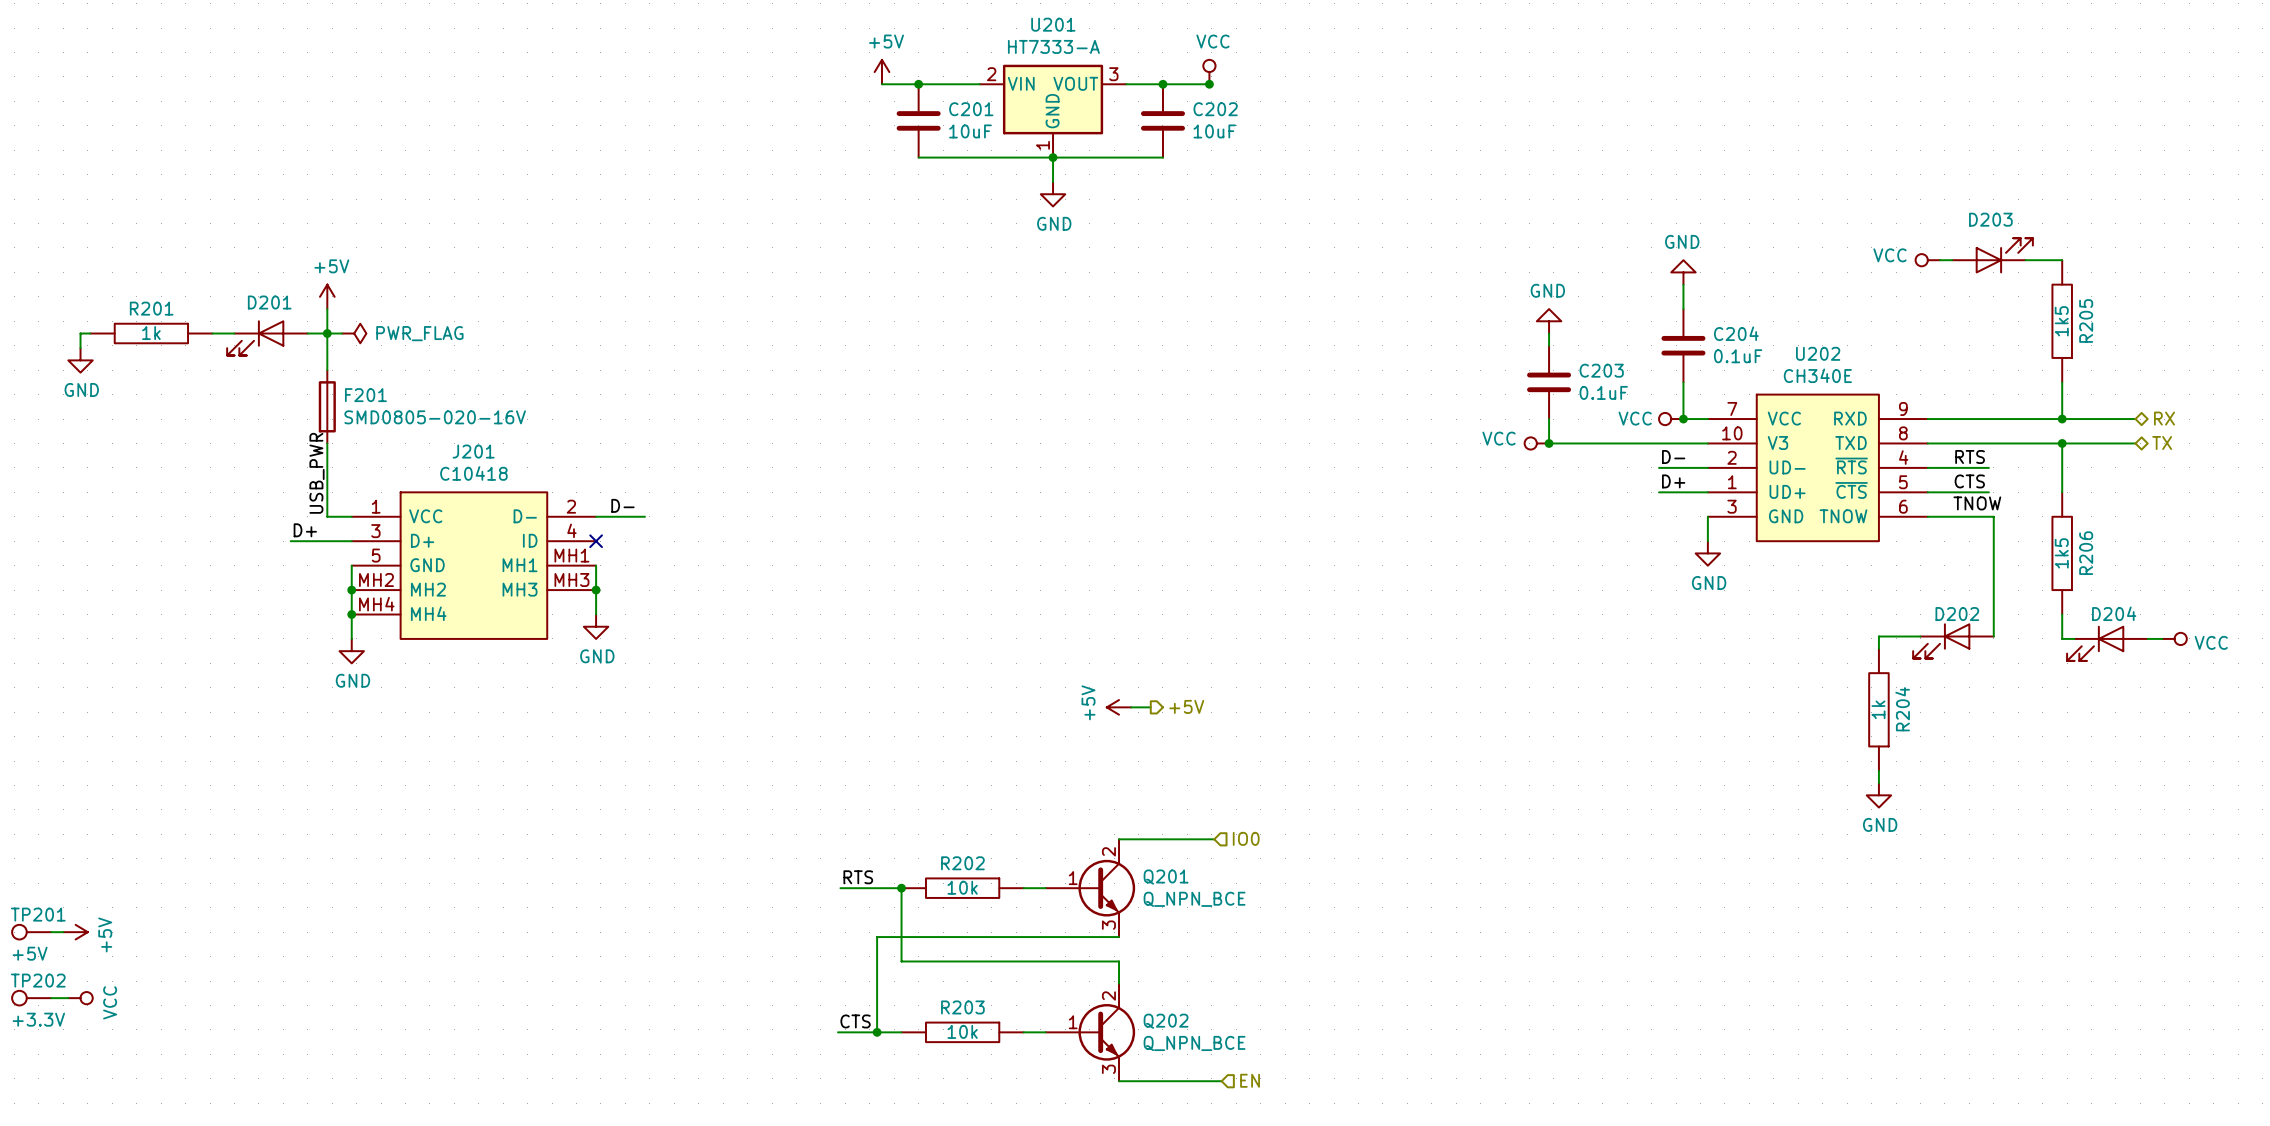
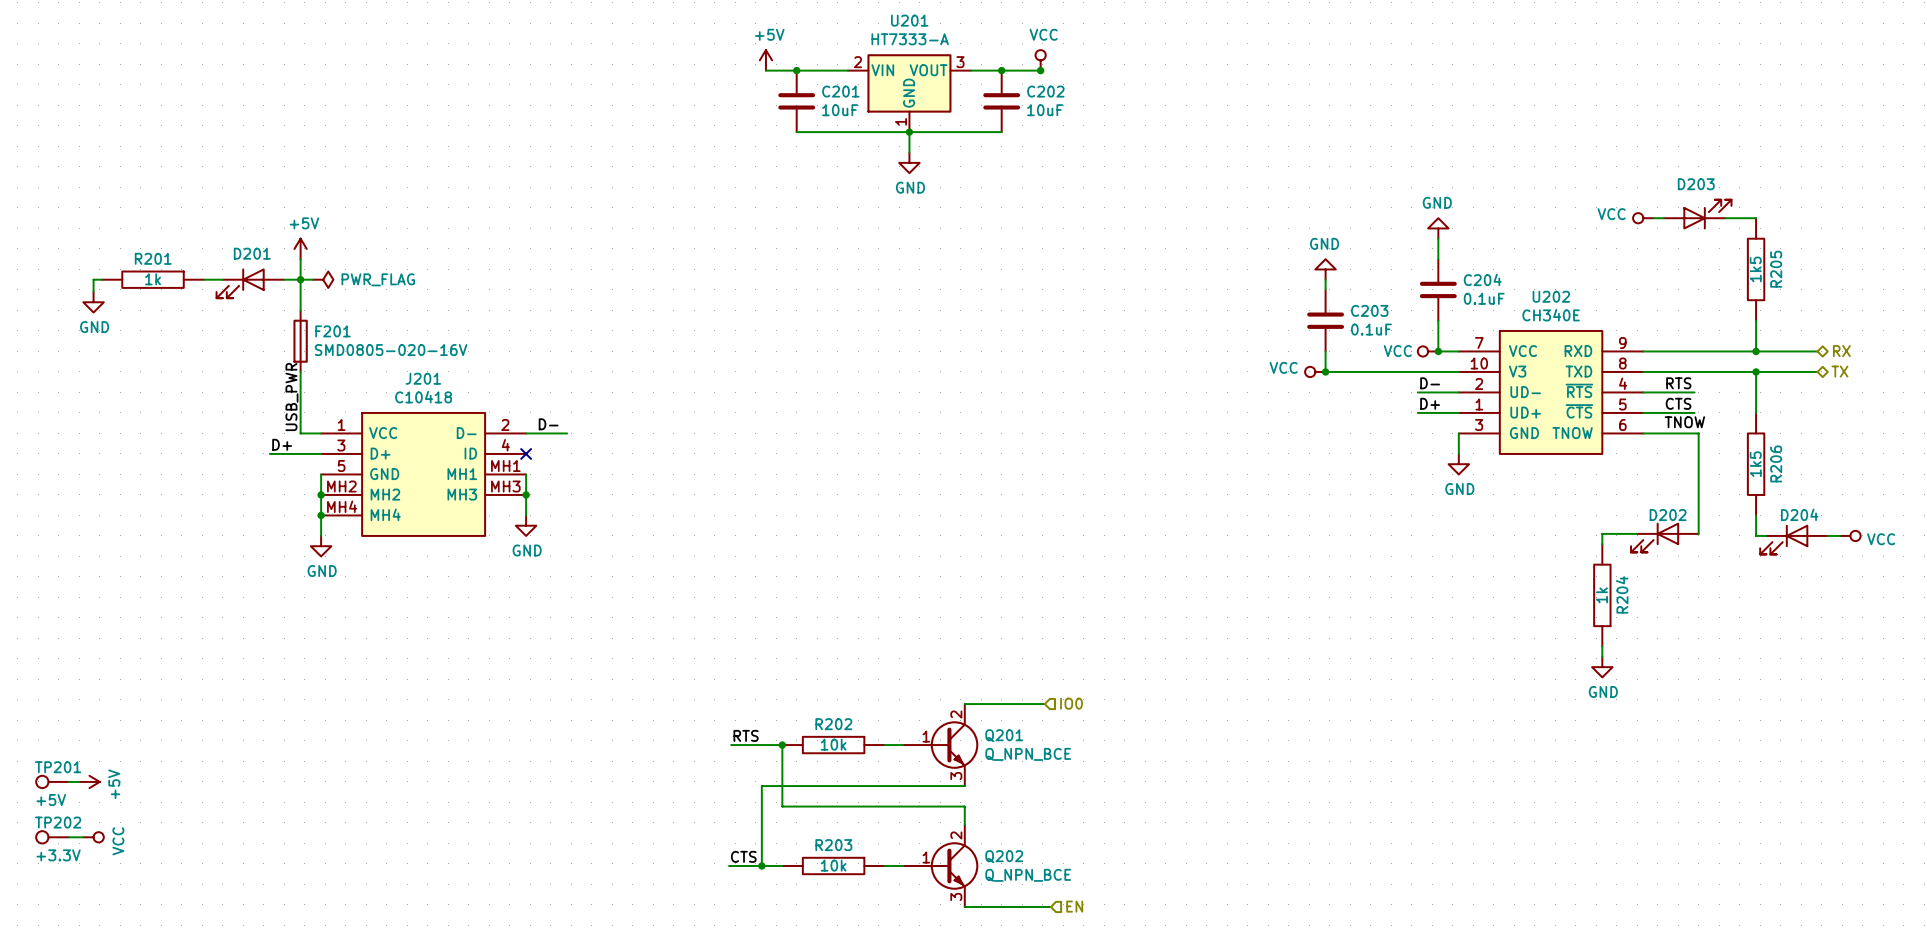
hierarchical label: +5V (1186, 706) -> none
power symbol: +5V (1119, 707) -> none
wire: (1131, 707) (1150, 707) -> none

